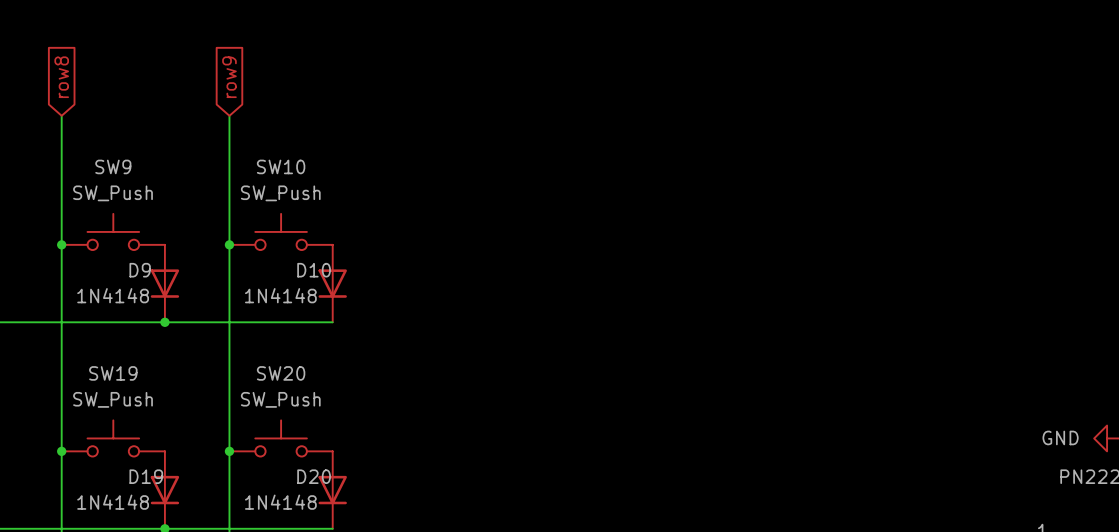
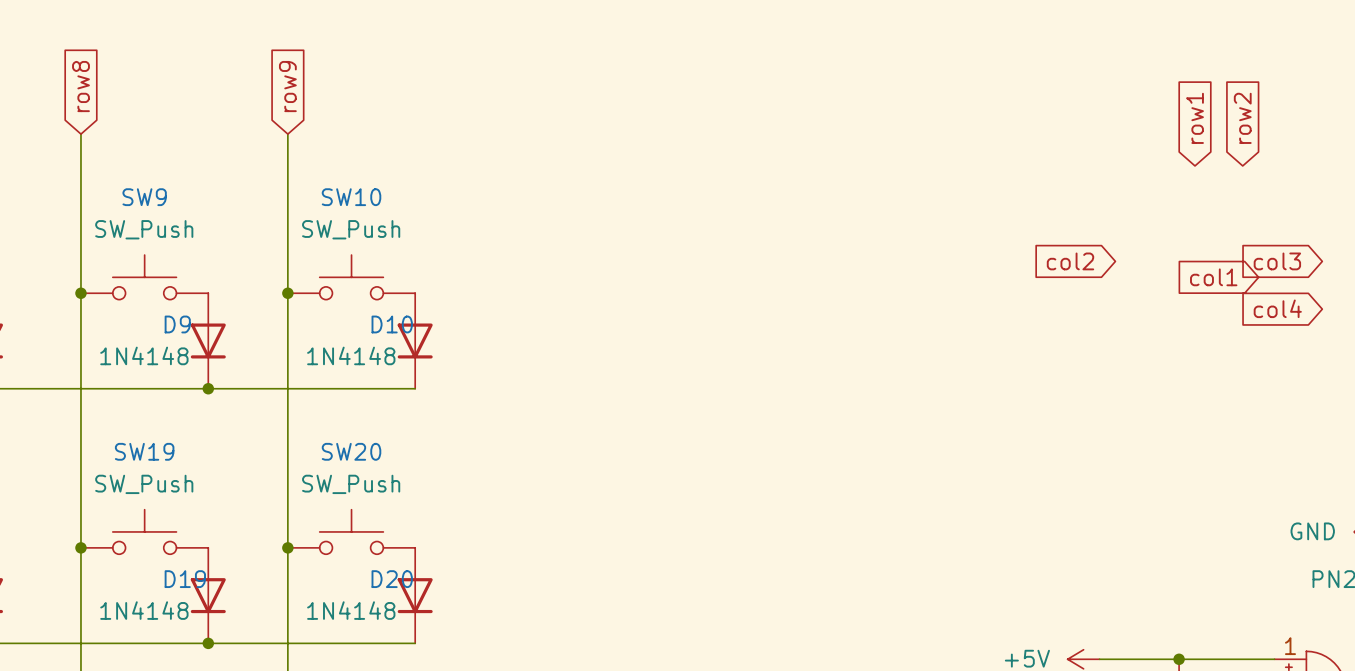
global label: none -> row1 (1194, 118)
global label: none -> row2 (1242, 118)
global label: none -> col2 (1070, 261)
global label: none -> col3 (1277, 261)
global label: none -> col1 (1213, 277)
global label: none -> col4 (1277, 308)

